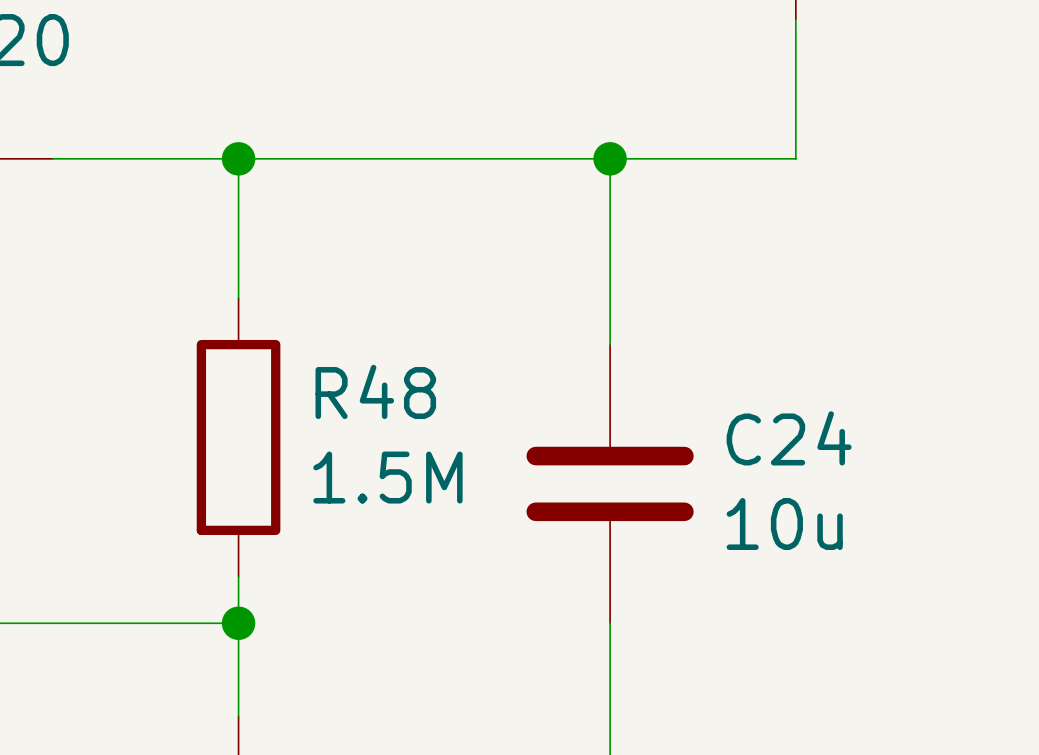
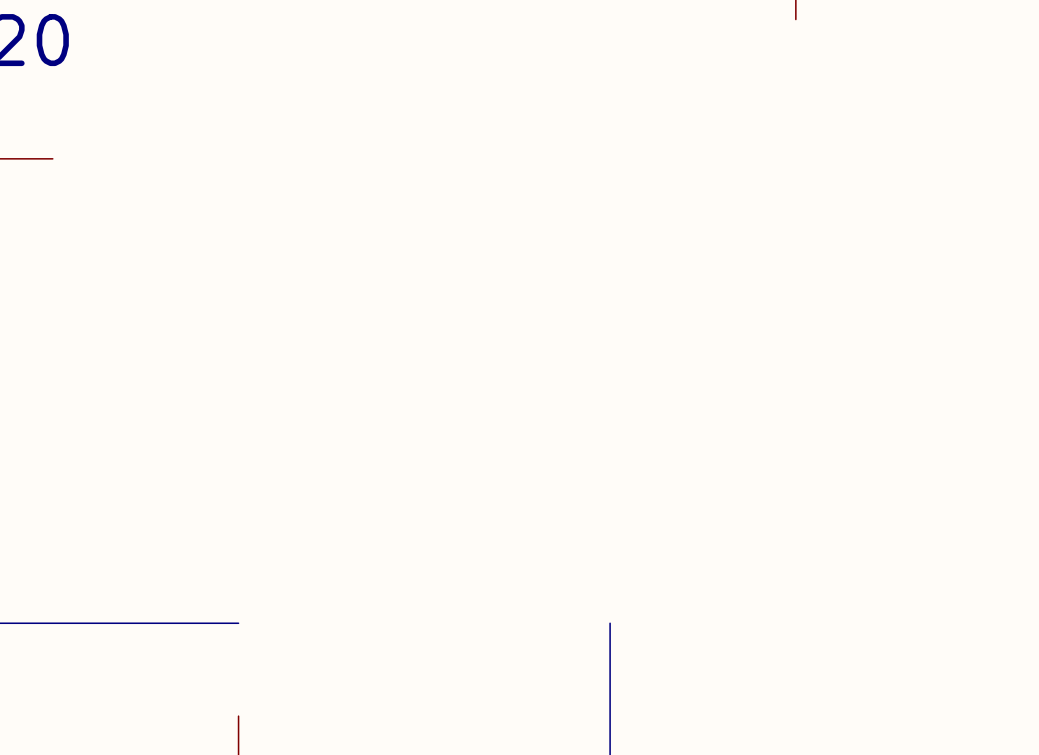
wire: (795, 19) (795, 158) (52, 158) -> none
wire: (238, 158) (238, 298) -> none
junction: (238, 158) -> none
wire: (610, 158) (610, 344) -> none
junction: (610, 158) -> none
R48: 1.5M (238, 437) -> none
C24: 10u (610, 483) -> none
wire: (238, 576) (238, 716) -> none
junction: (238, 623) -> none

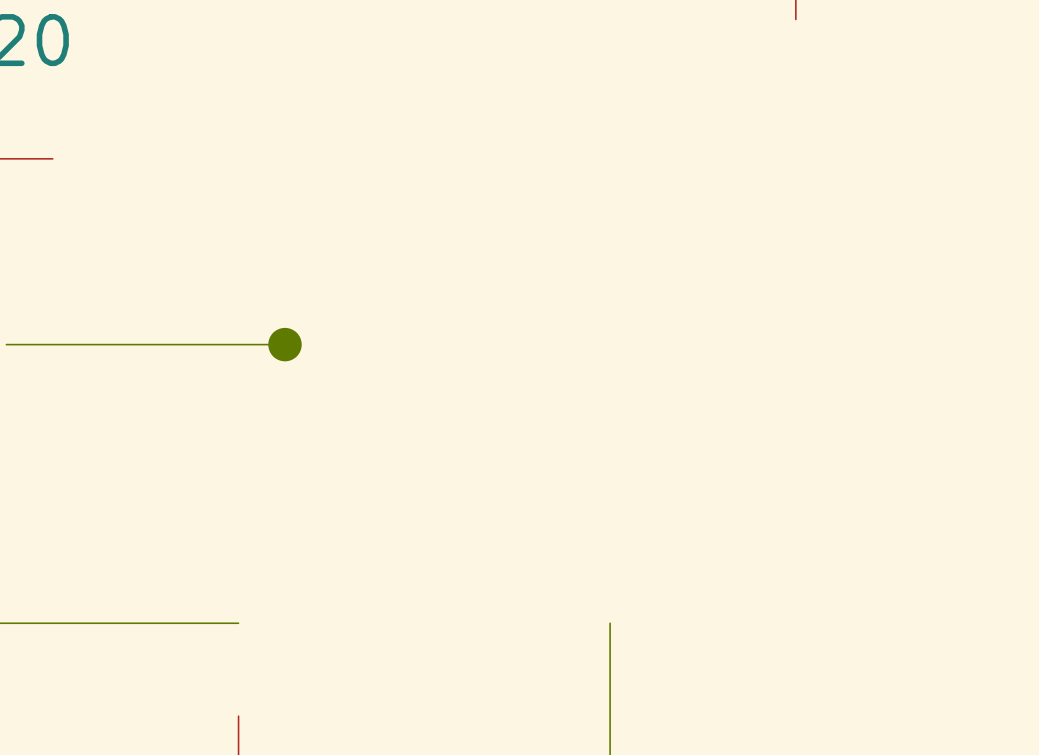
wire: none -> (6, 344) (284, 344)
junction: none -> (284, 344)

